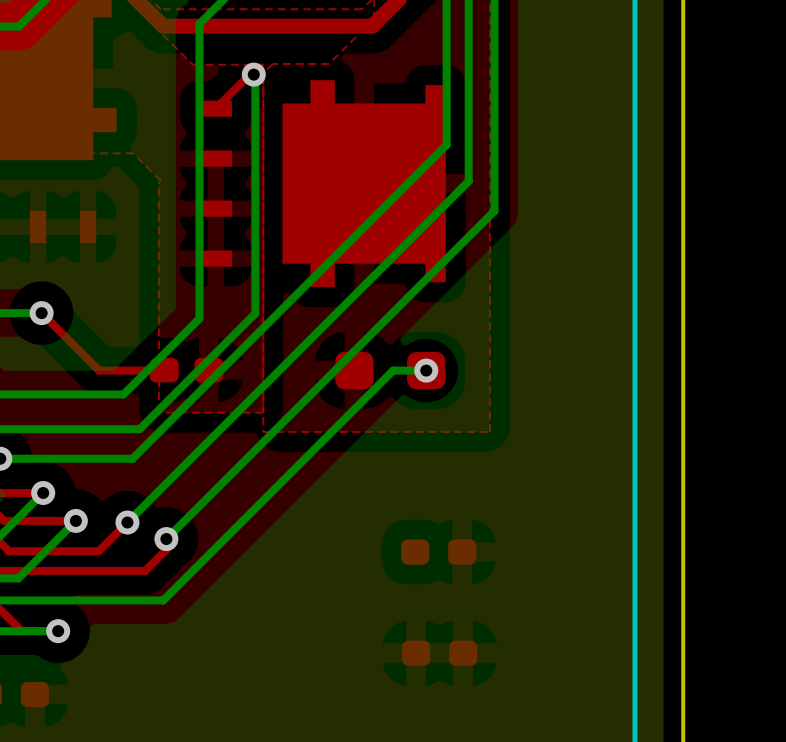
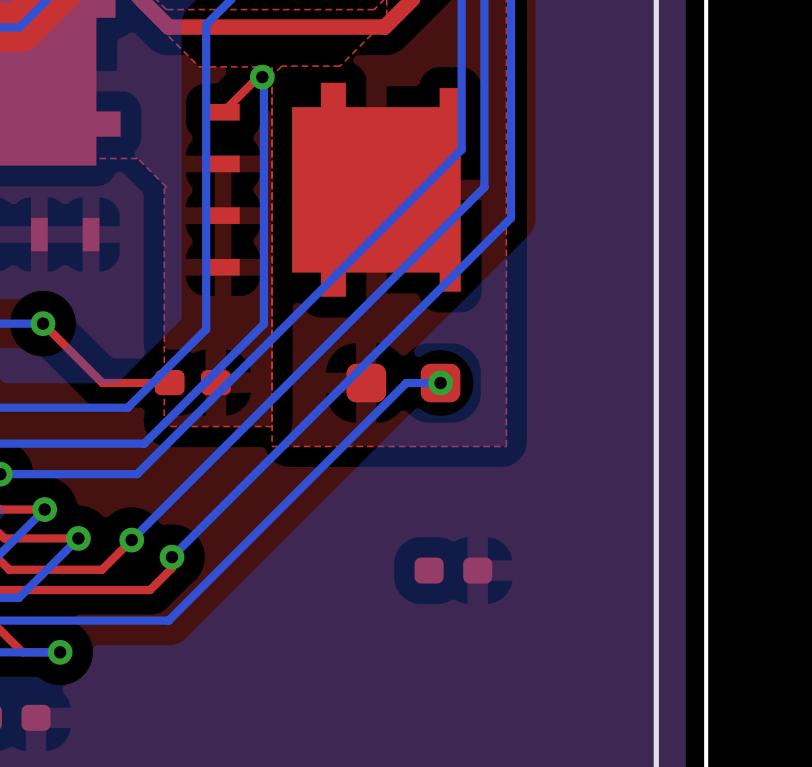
part: (439, 653) -> none

